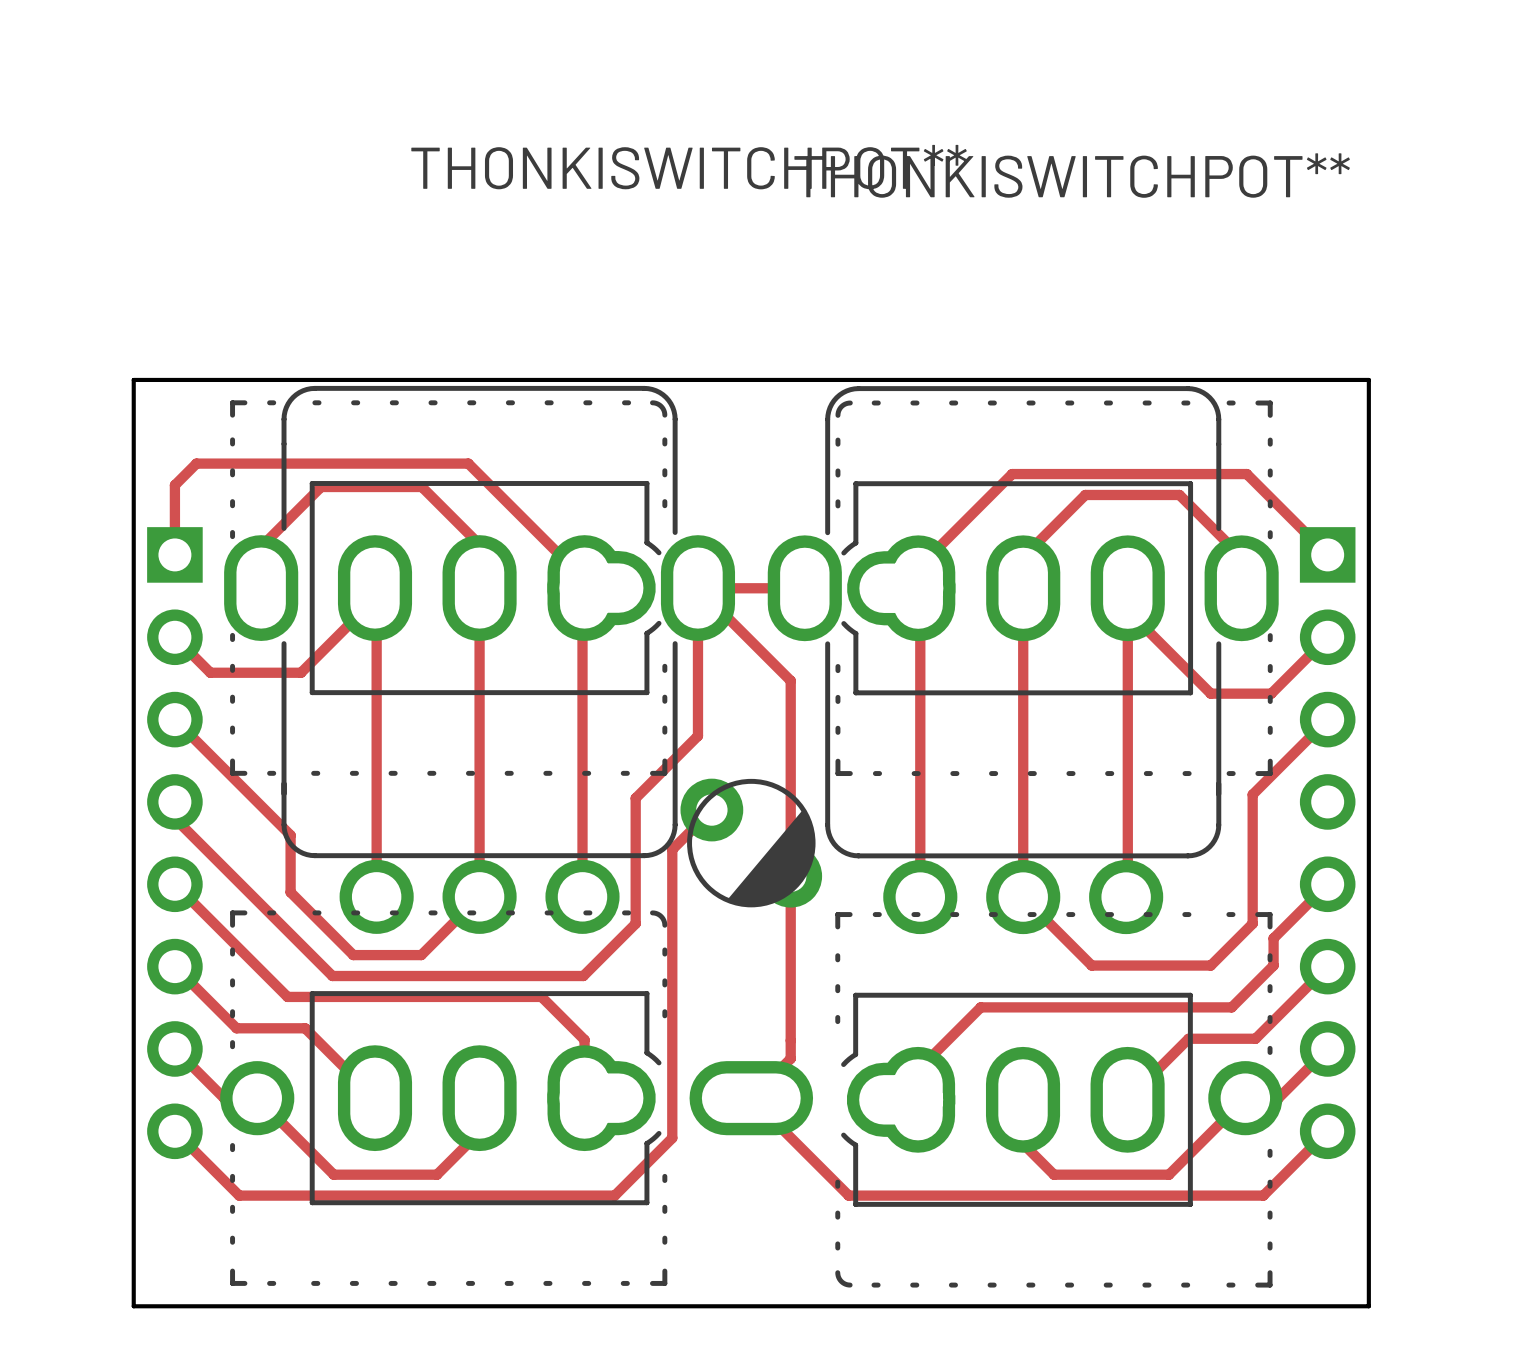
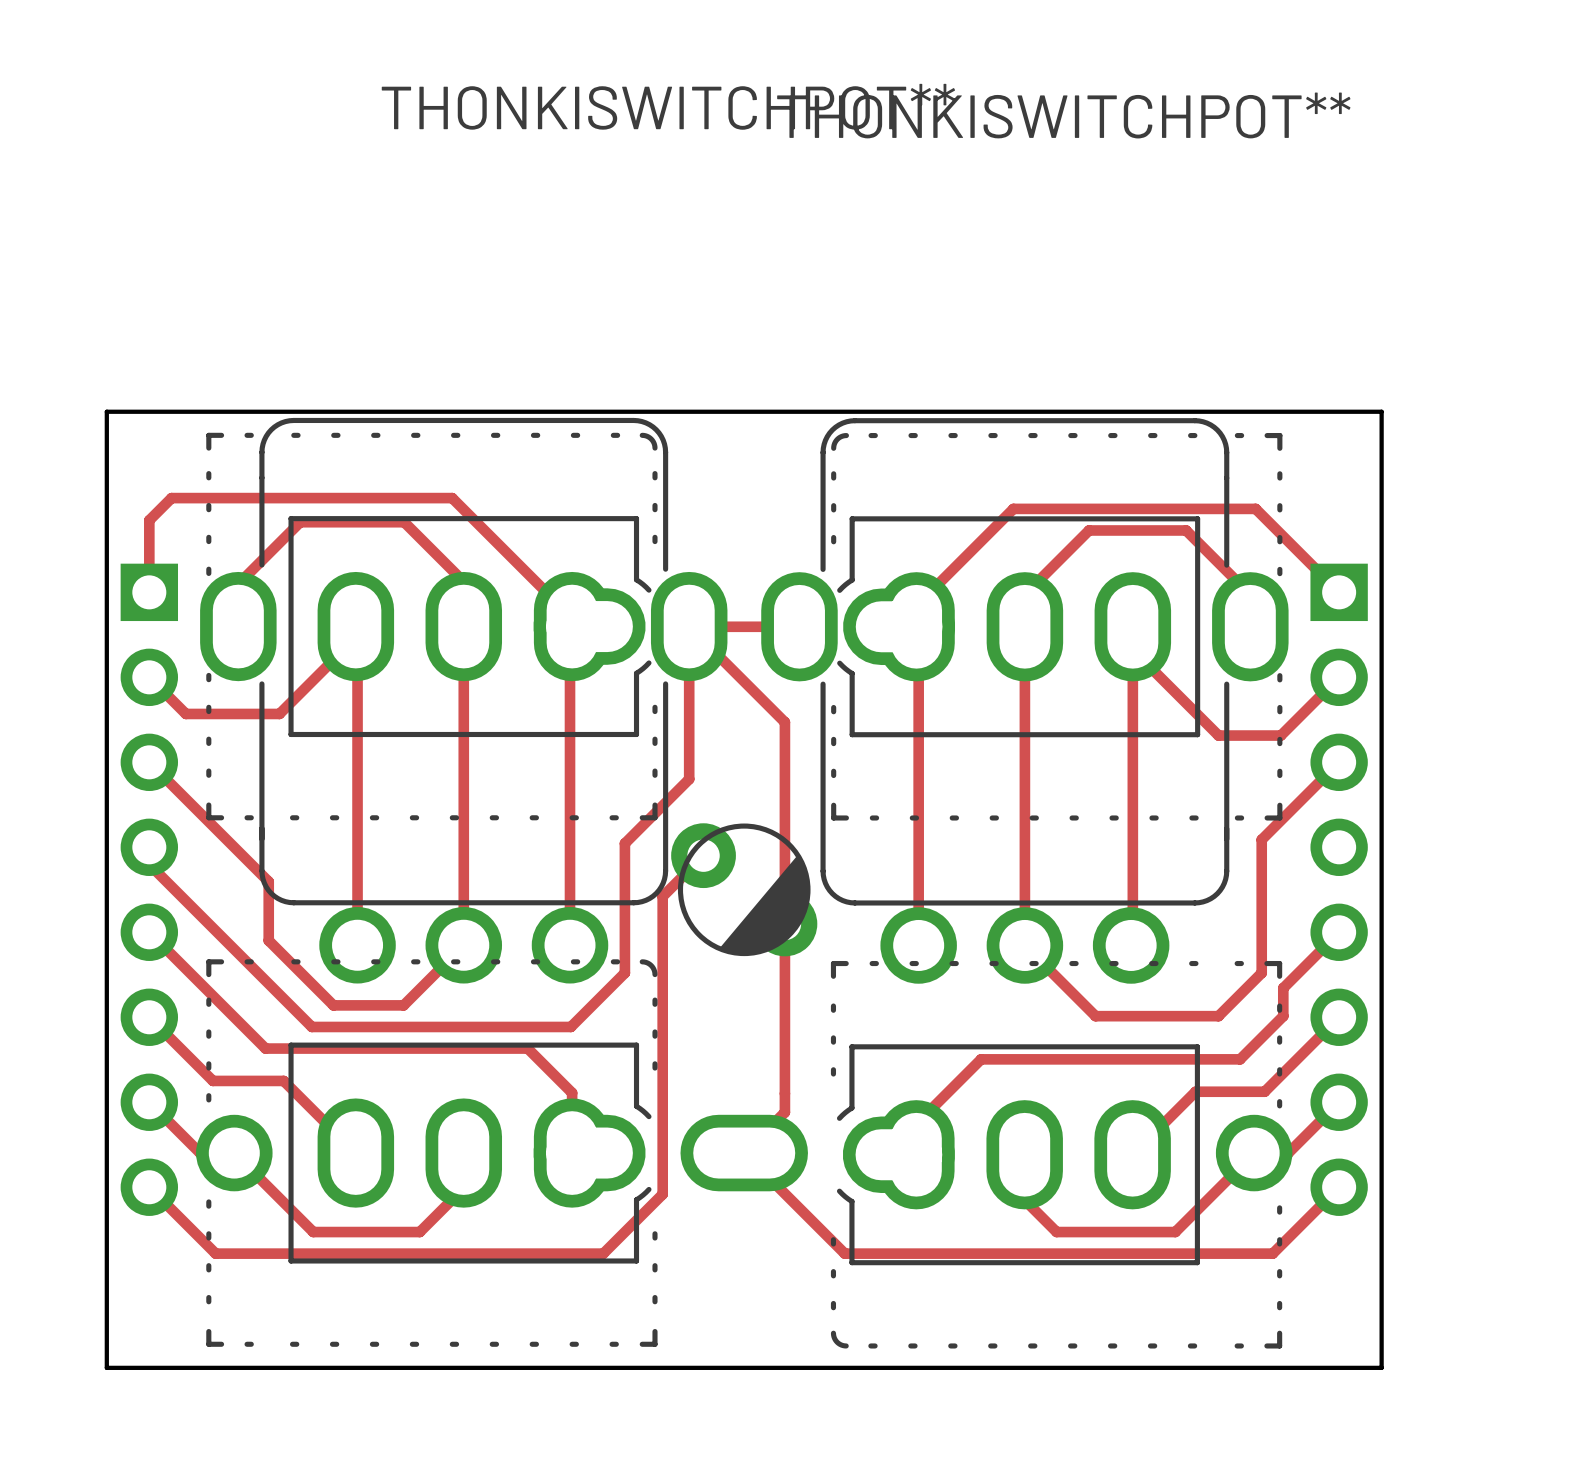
THONKISWITCHPOT** name position: THONKISWITCHPOT** (689, 167) -> THONKISWITCHPOT** (668, 106)
THONKISWITCHPOT** name position: THONKISWITCHPOT** (1072, 175) -> THONKISWITCHPOT** (1063, 115)

